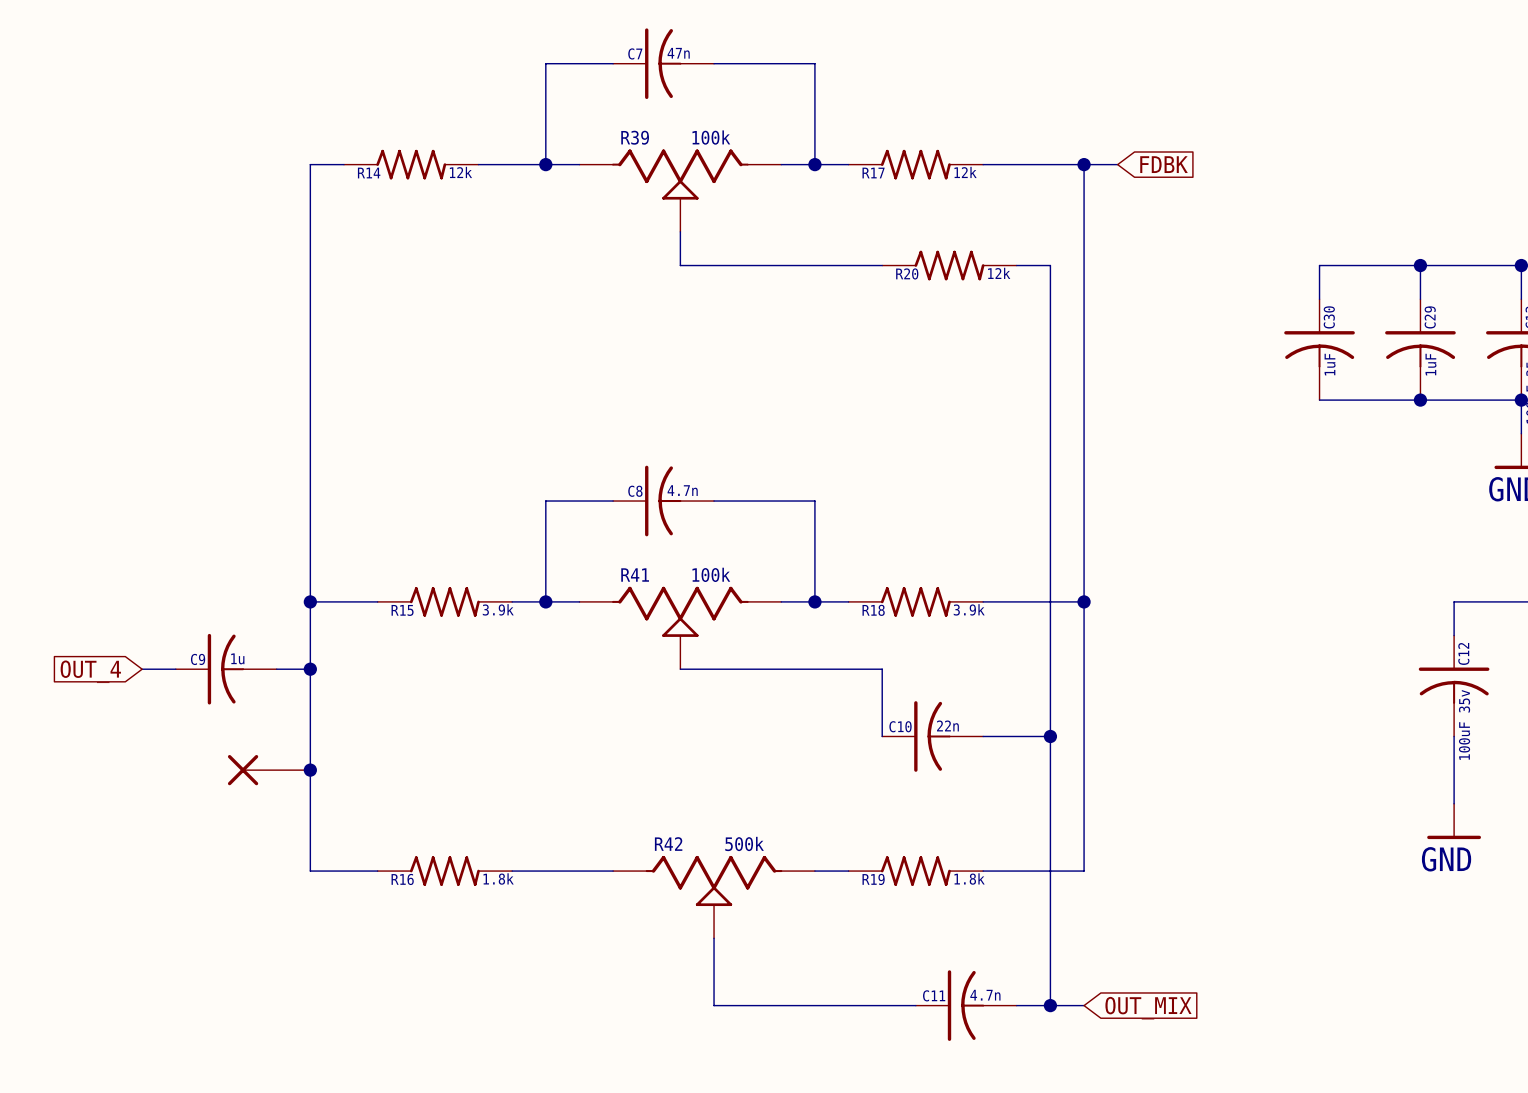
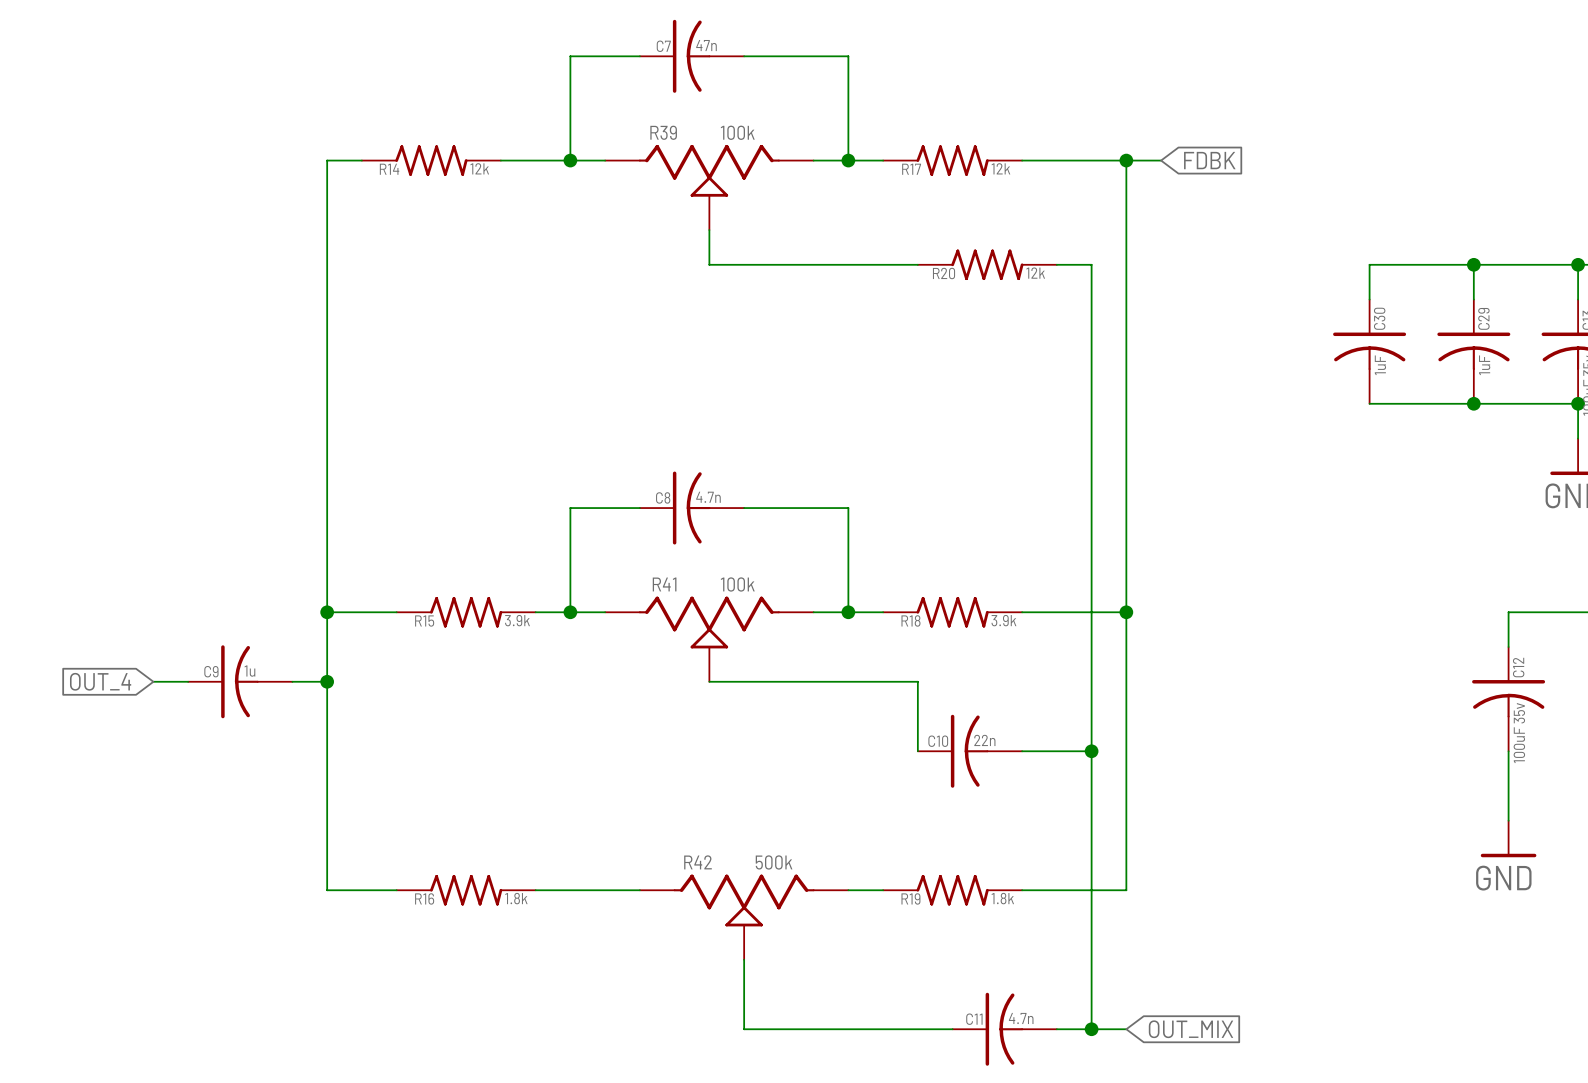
part: (269, 770) -> none
junction: (310, 770) -> none

